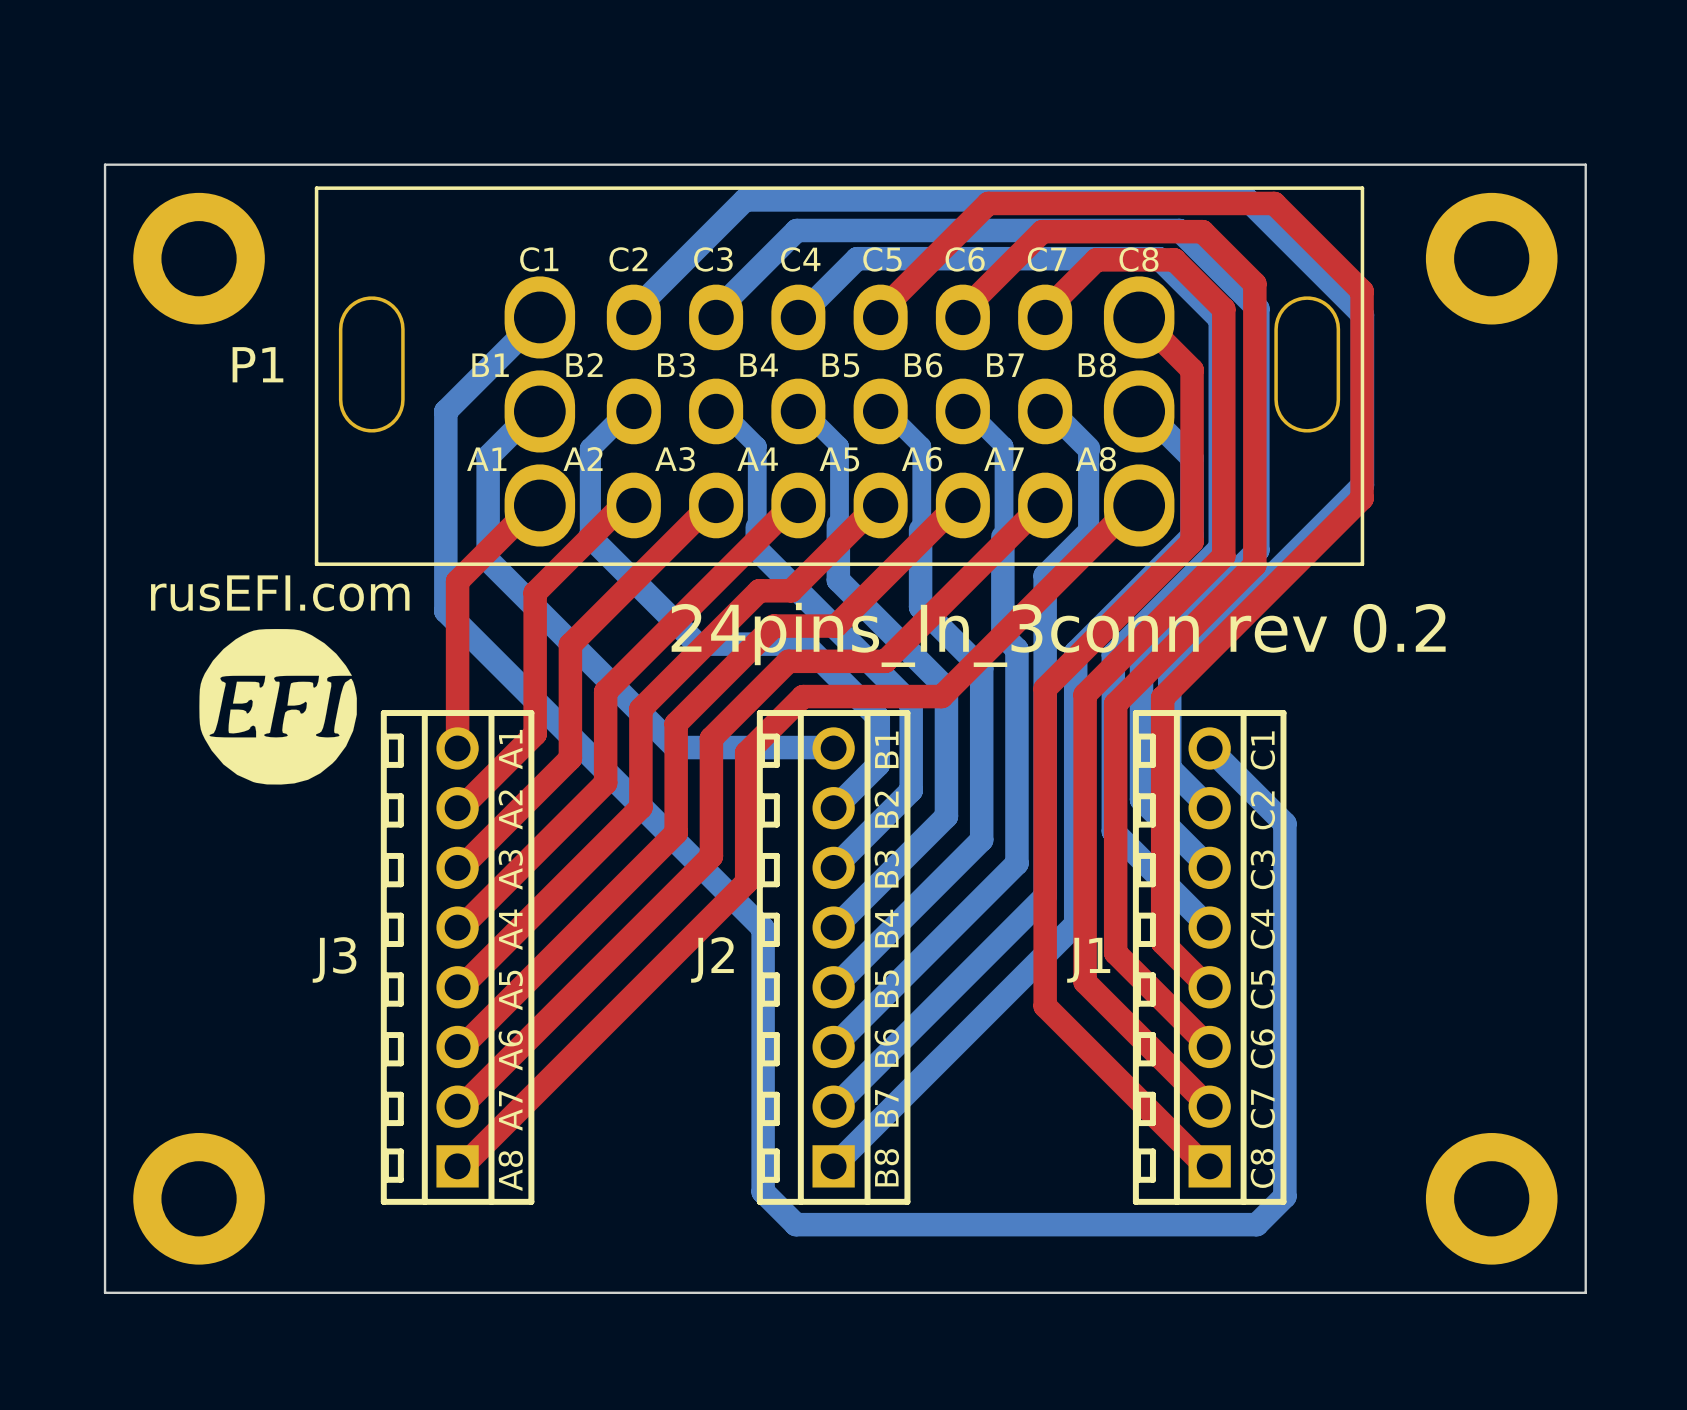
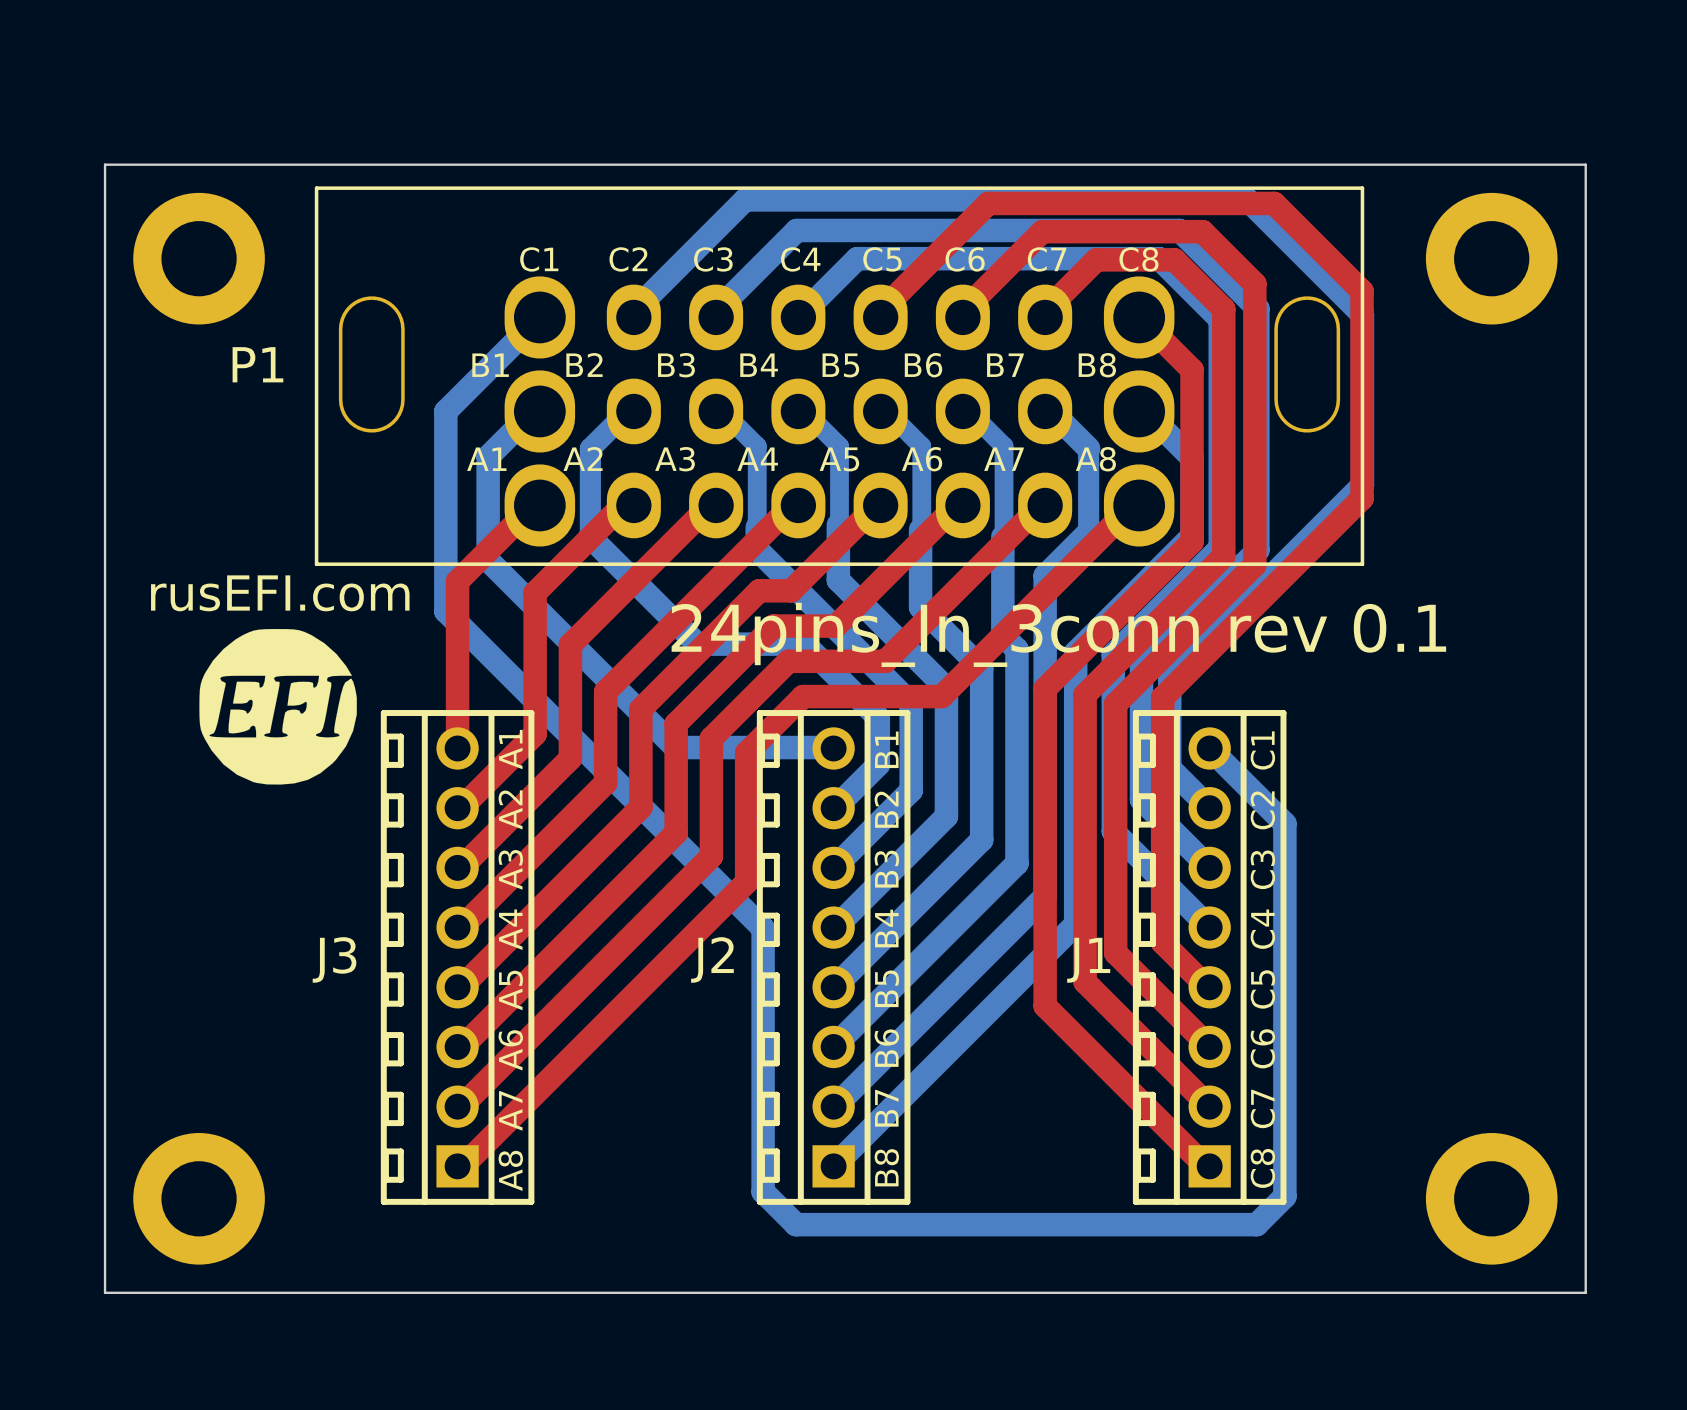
text: 24pins_In_3conn rev 0.2 (1058, 634) -> 24pins_In_3conn rev 0.1 (1058, 634)

